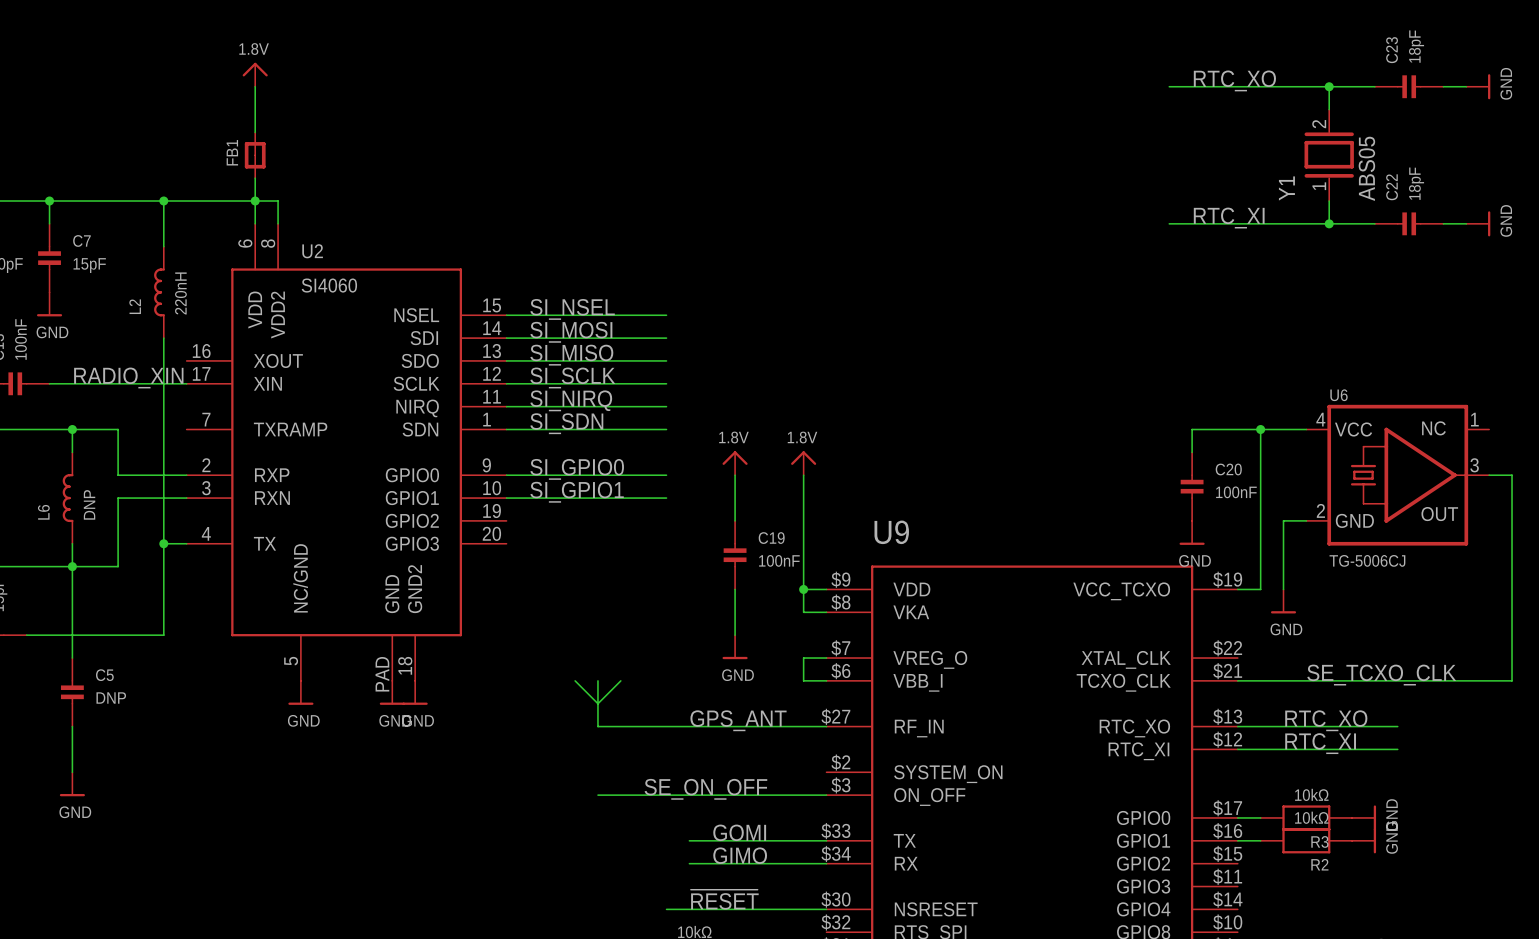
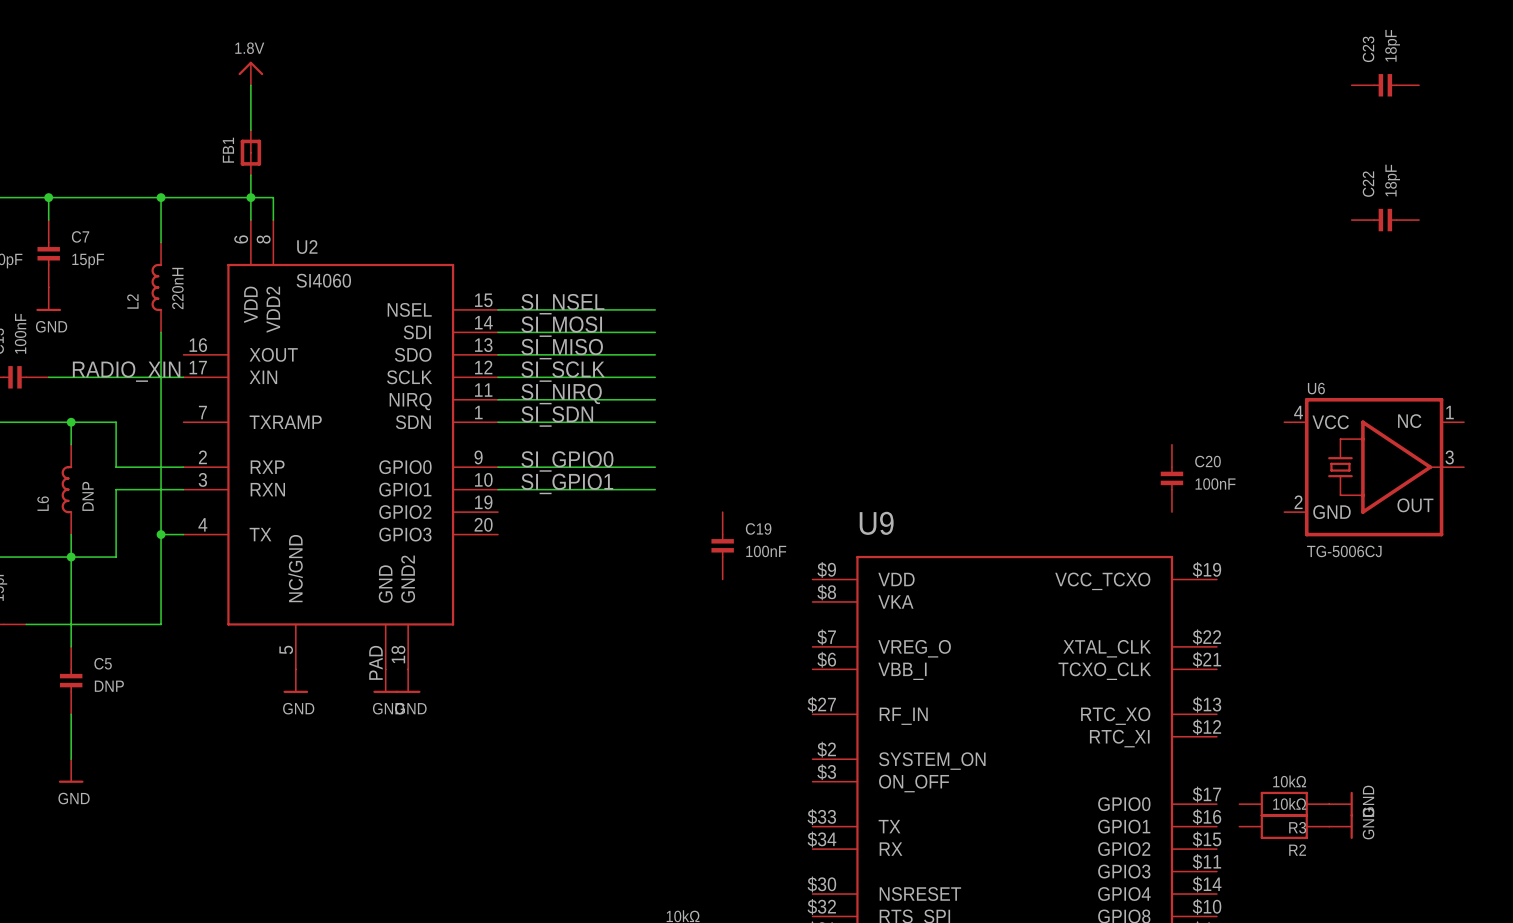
label: RTC_XO (1234, 80) -> none
wire: (1169, 86) (1374, 86) -> none
wire: (1329, 86) (1329, 109) -> none
junction: (1329, 86) -> none
wire: (1443, 86) (1466, 86) -> none
power symbol: GND (1478, 86) -> none
Y1: ABS05 (1329, 155) -> none
wire: (1329, 200) (1329, 223) -> none
label: RTC_XI (1229, 218) -> none
wire: (1169, 223) (1374, 223) -> none
junction: (1329, 223) -> none
wire: (1443, 223) (1466, 223) -> none
power symbol: GND (1478, 223) -> none
wire: (1260, 429) (1260, 589) (1237, 589) -> none
junction: (1260, 429) -> none
wire: (1306, 429) (1192, 429) (1192, 452) -> none
power symbol: 1.8V (735, 463) -> none
power symbol: 1.8V (803, 463) -> none
wire: (735, 475) (735, 520) -> none
wire: (803, 475) (803, 612) (826, 612) -> none
wire: (1489, 475) (1512, 475) (1512, 680) (1237, 680) -> none
wire: (1306, 520) (1283, 520) (1283, 589) -> none
power symbol: GND (1192, 532) -> none
wire: (735, 589) (735, 635) -> none
wire: (803, 589) (826, 589) -> none
junction: (803, 589) -> none
power symbol: GND (1283, 601) -> none
power symbol: GND (735, 647) -> none
wire: (826, 658) (803, 658) (803, 680) (826, 680) -> none
label: SE_TCXO_CLK (1381, 675) -> none
wire: (575, 680) (597, 703) (620, 680) -> none
wire: (597, 680) (597, 726) (826, 726) -> none
label: GPS_ANT (738, 720) -> none
label: RTC_XO (1326, 720) -> none
wire: (1237, 726) (1397, 726) -> none
label: RTC_XI (1320, 743) -> none
wire: (1237, 749) (1397, 749) -> none
label: SE_ON_OFF (705, 789) -> none
wire: (597, 795) (826, 795) -> none
wire: (1237, 817) (1260, 817) -> none
label: GOMI (739, 832) -> none
wire: (689, 840) (826, 840) -> none
wire: (1237, 840) (1260, 840) -> none
label: GIMO (740, 855) -> none
wire: (689, 863) (826, 863) -> none
label: ~{RESET} (724, 899) -> none
wire: (666, 909) (826, 909) -> none

